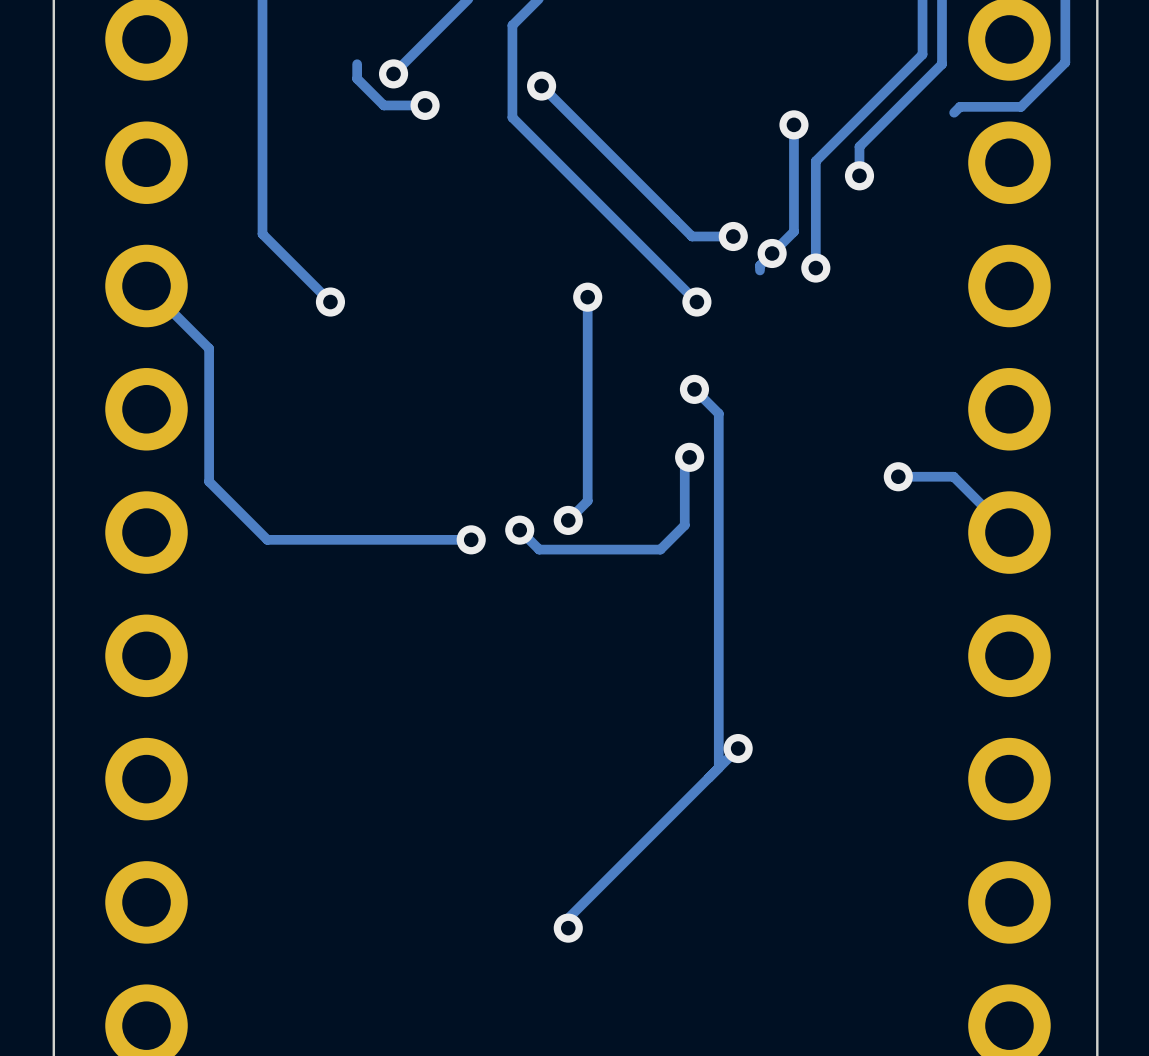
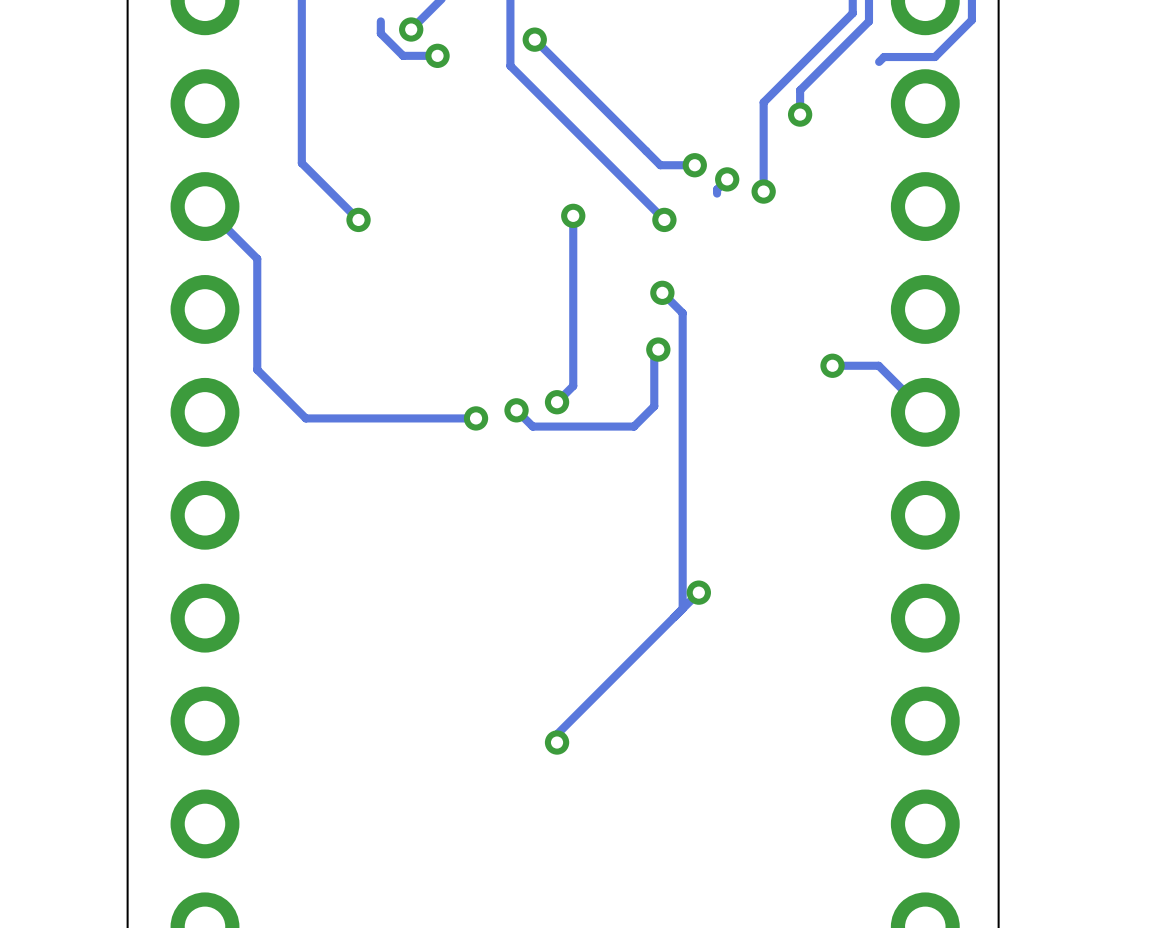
track: (793, 124) (793, 231) (772, 253) -> none
via: (793, 124) -> none

